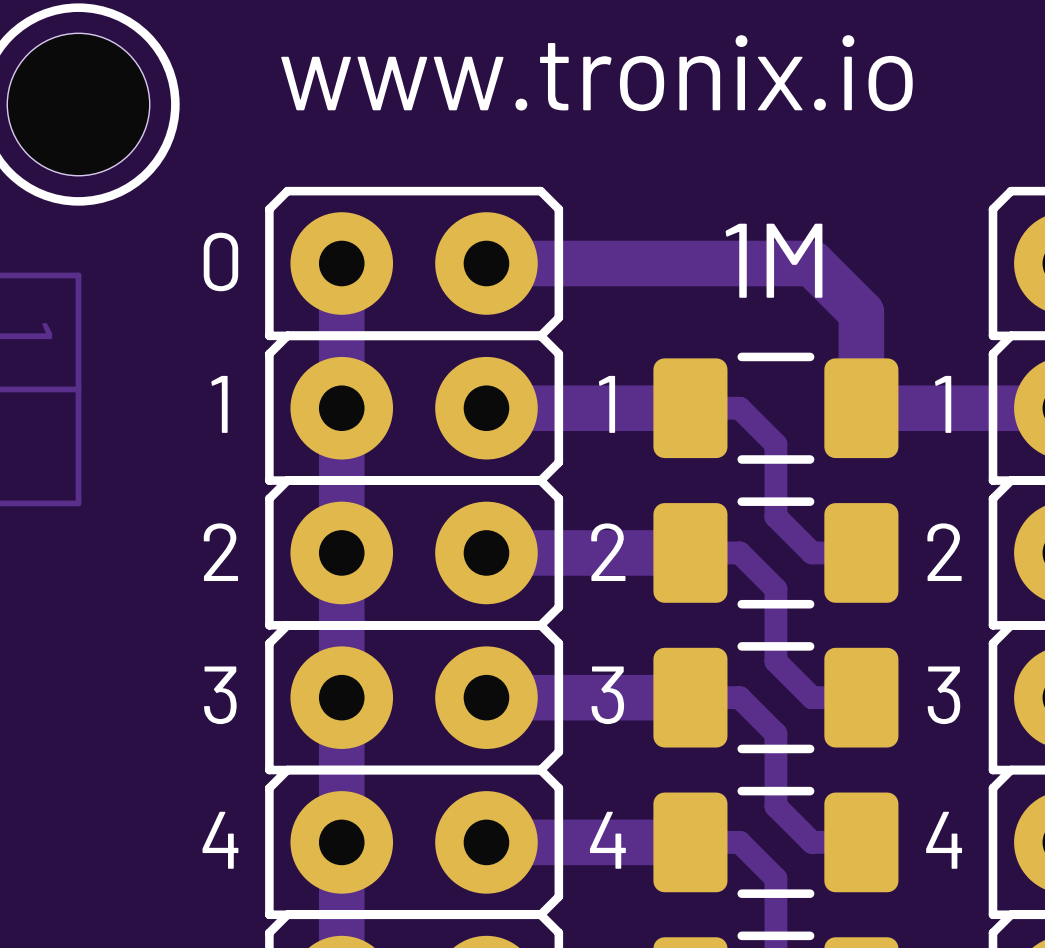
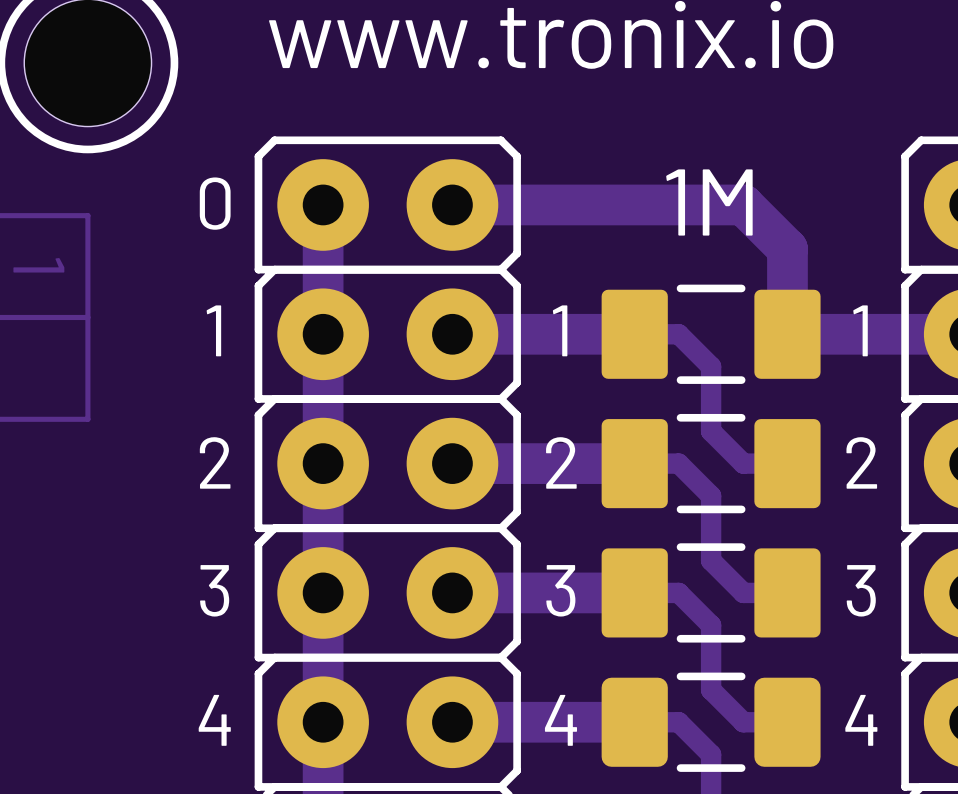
part footprint: [653, 352, 899, 464] -> [601, 284, 821, 384]
part footprint: [653, 497, 899, 609] -> [601, 413, 821, 514]
part footprint: [653, 642, 899, 754] -> [601, 543, 821, 643]

